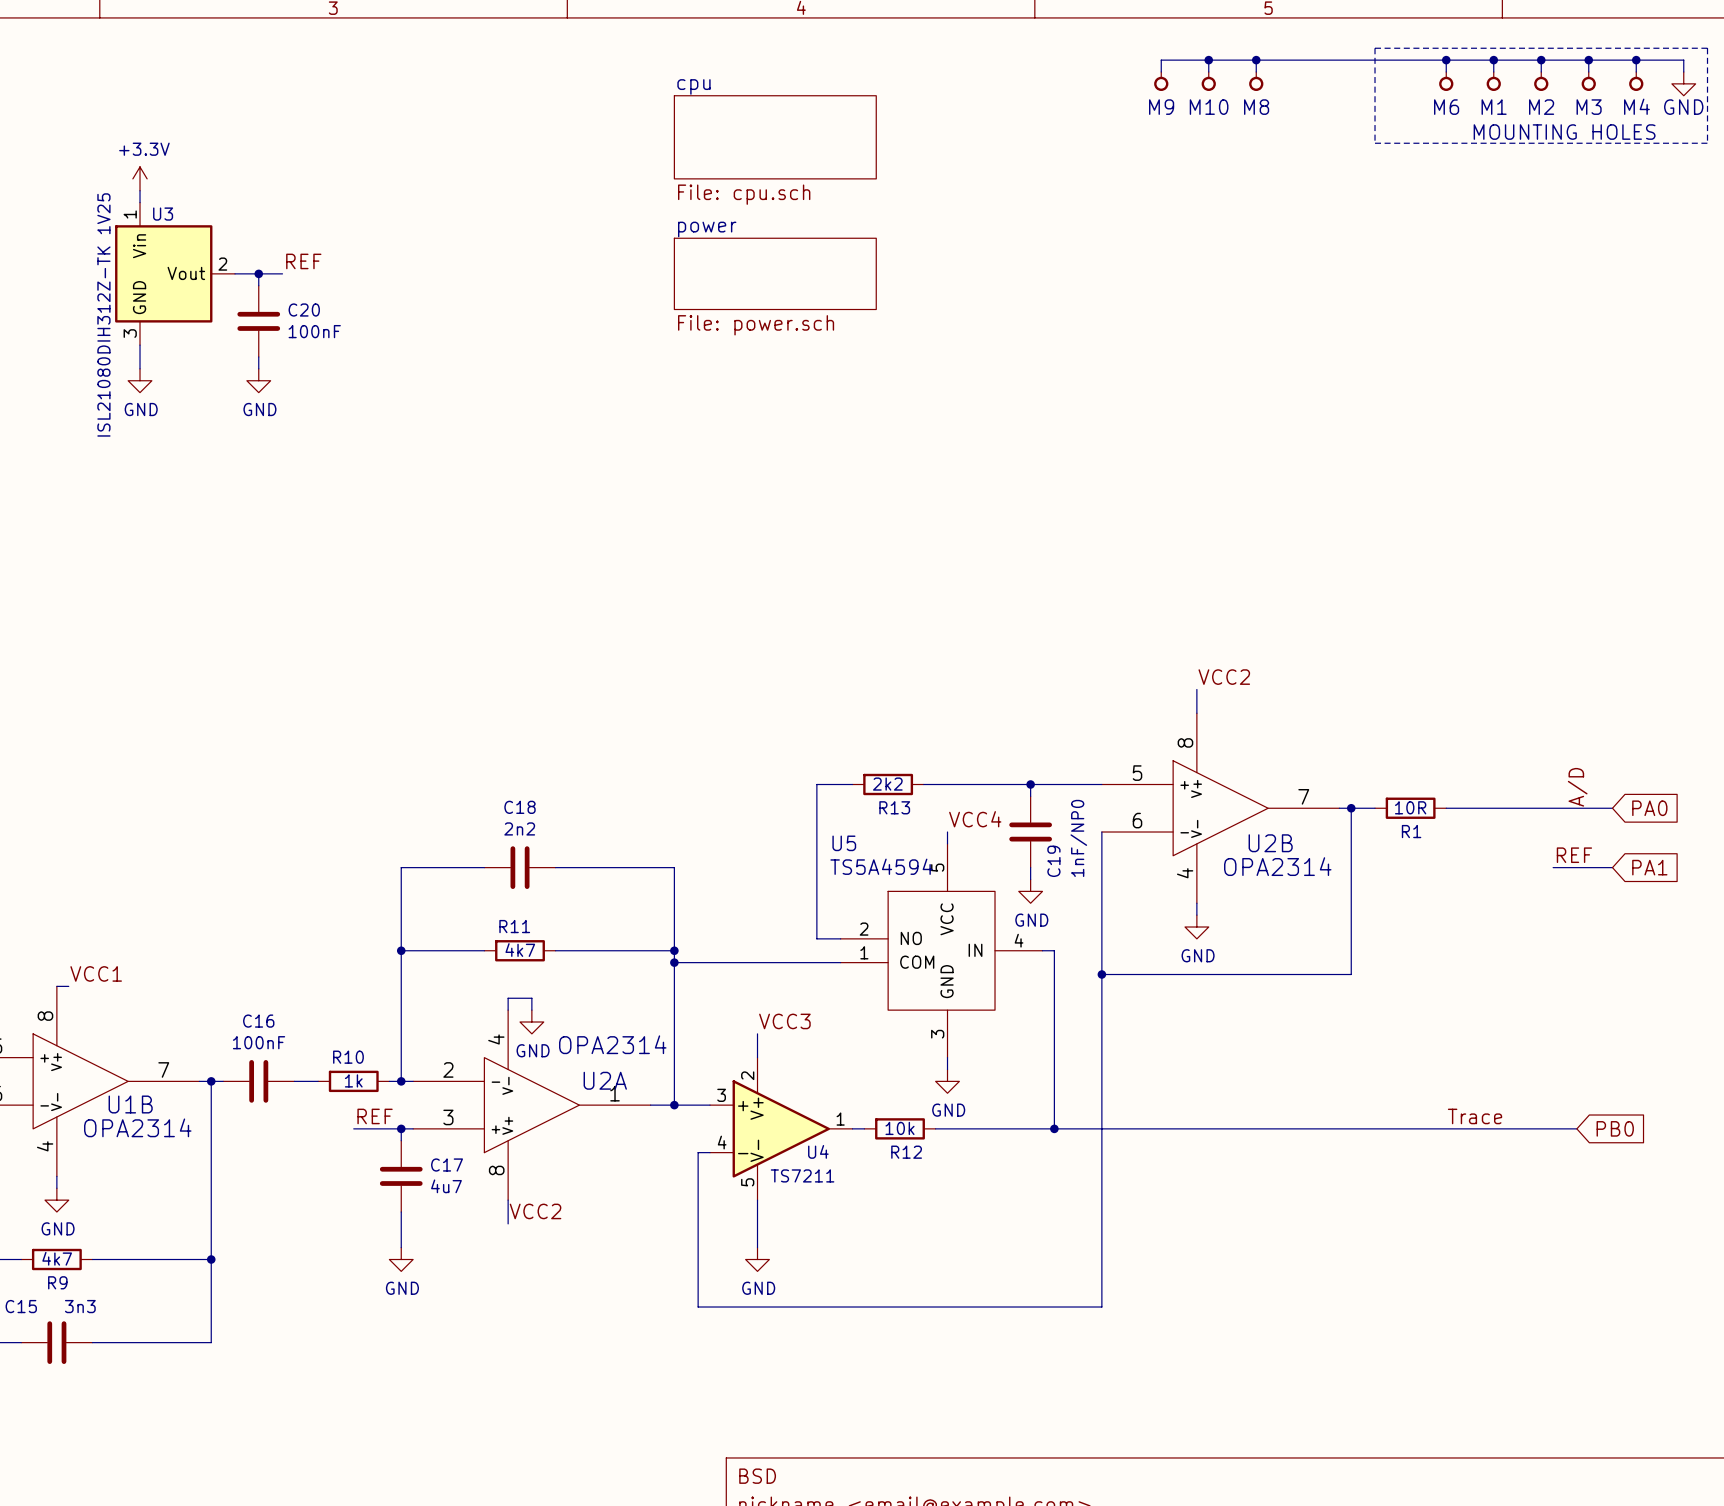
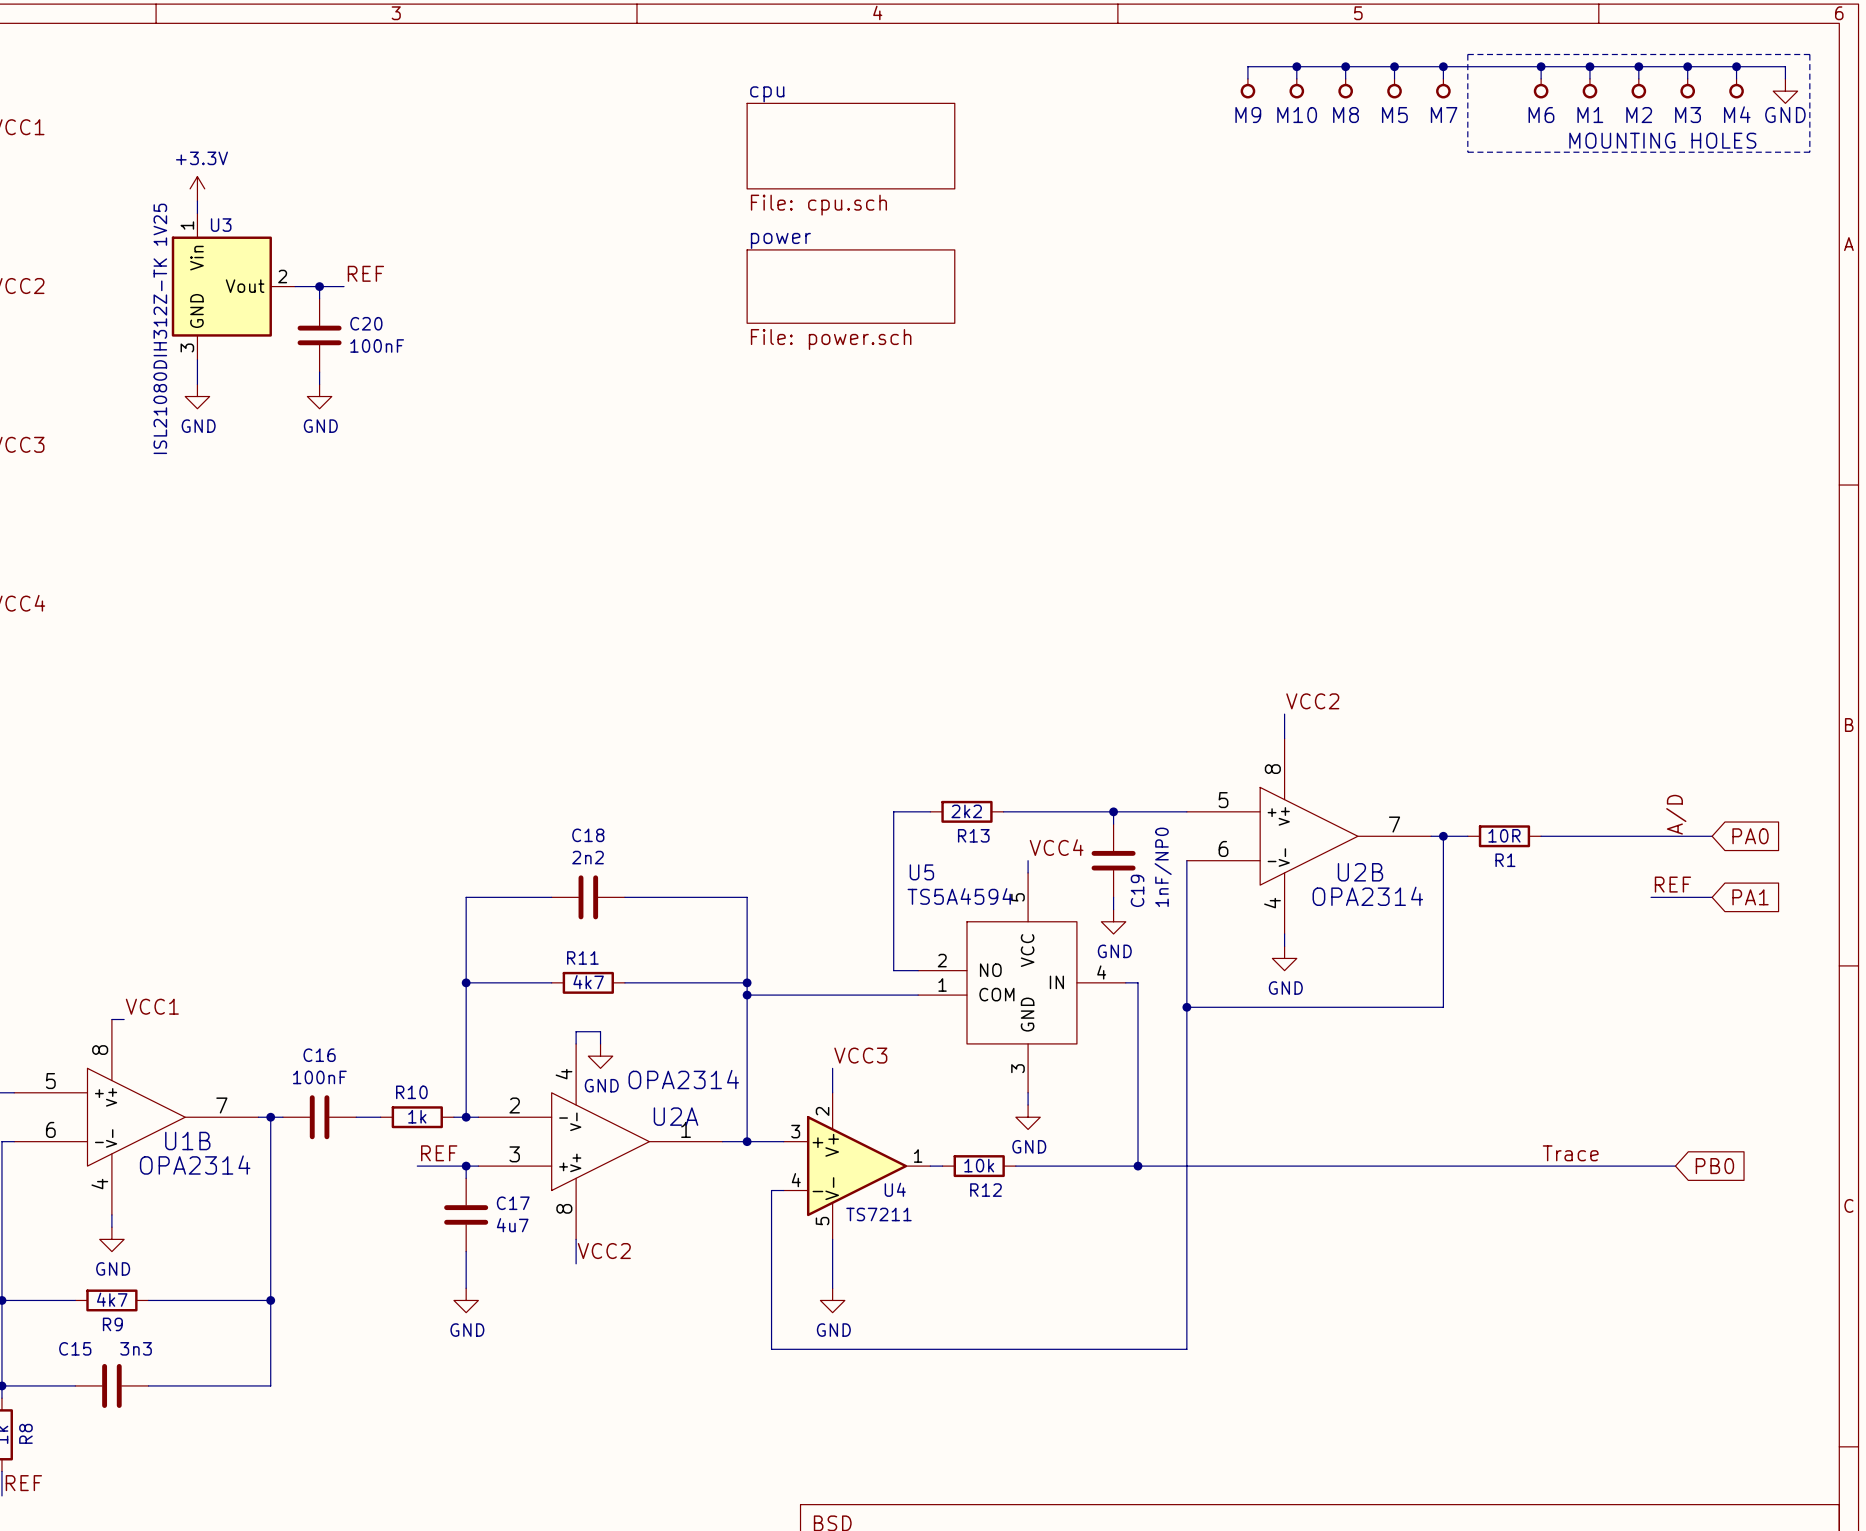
wire: none -> (1394, 66) (1394, 78)
junction: none -> (1394, 66)
wire: none -> (1443, 66) (1443, 78)
junction: none -> (1443, 66)
M5: none -> (1394, 88)
M7: none -> (1443, 88)

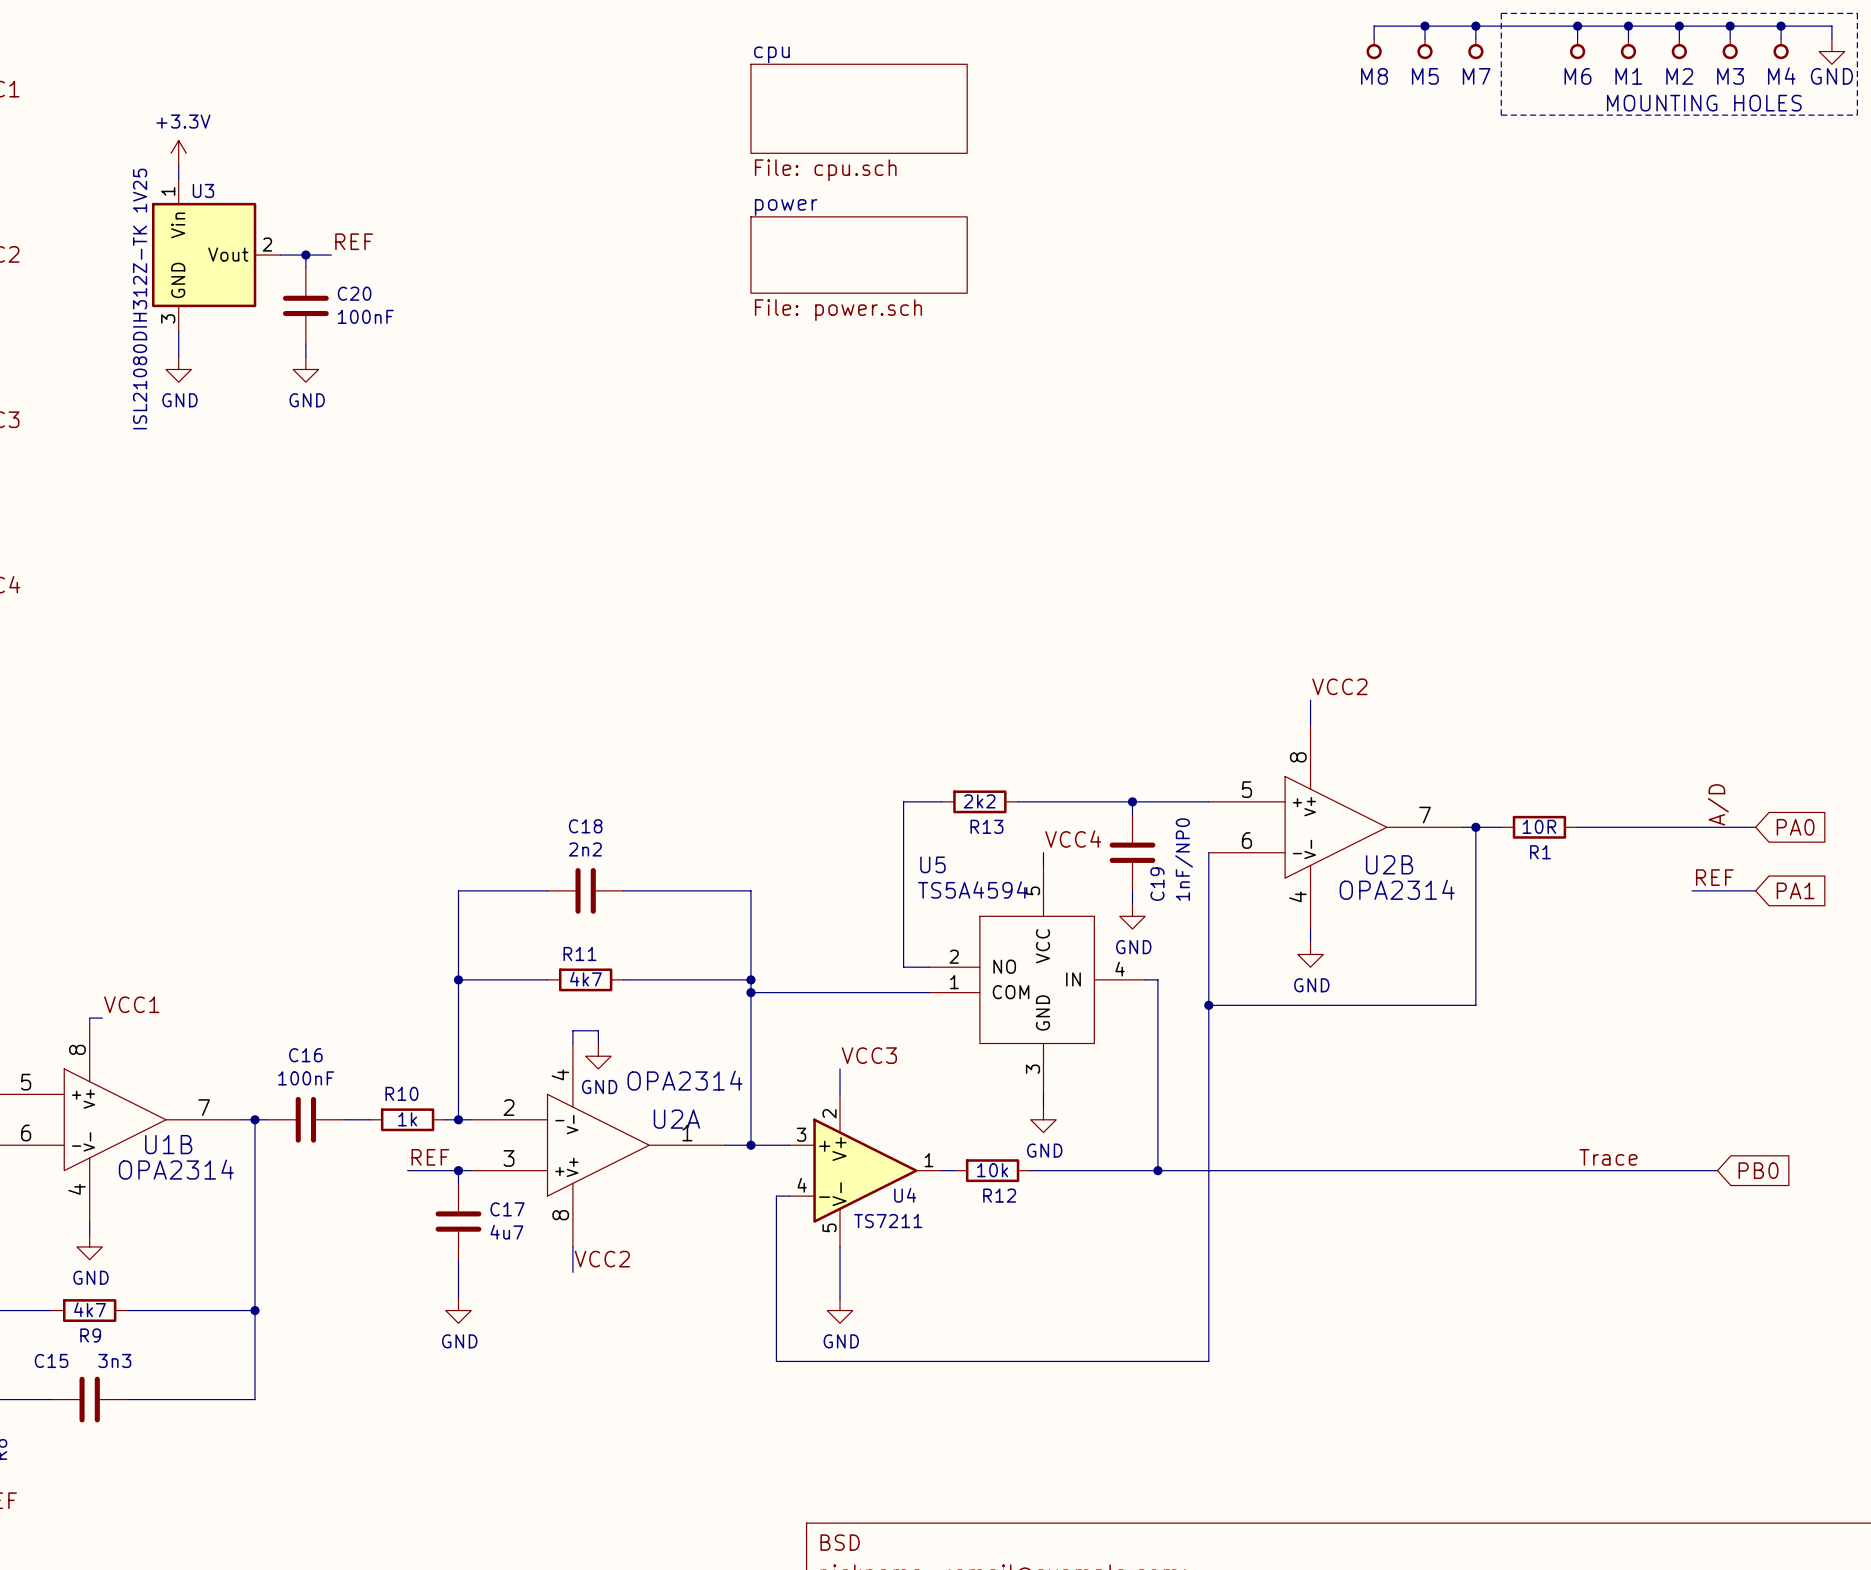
wire: (1296, 66) (1296, 78) -> none
junction: (1296, 66) -> none
wire: (1345, 66) (1247, 66) (1247, 78) -> none
junction: (1345, 66) -> none
M9: (1247, 88) -> none
M10: (1296, 88) -> none

